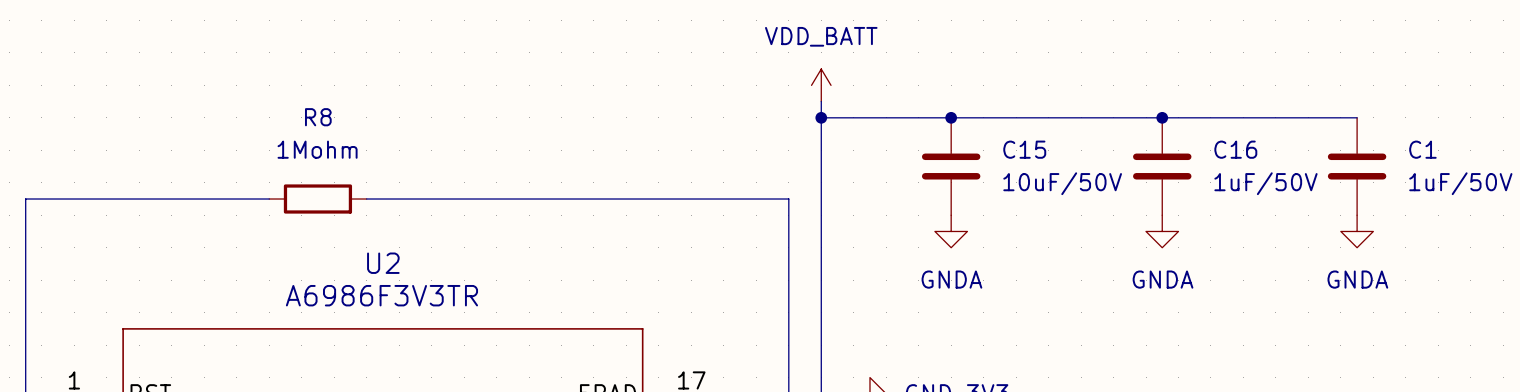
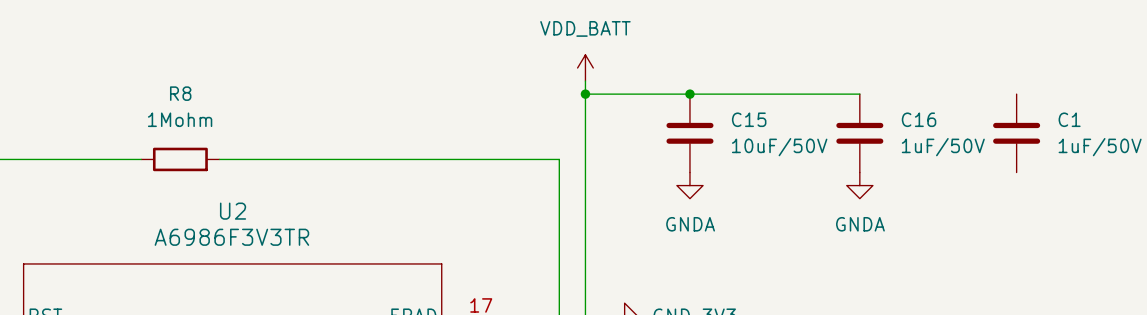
wire: (1162, 117) (1357, 117) -> none
junction: (1162, 117) -> none
power symbol: GNDA (1357, 231) -> none

